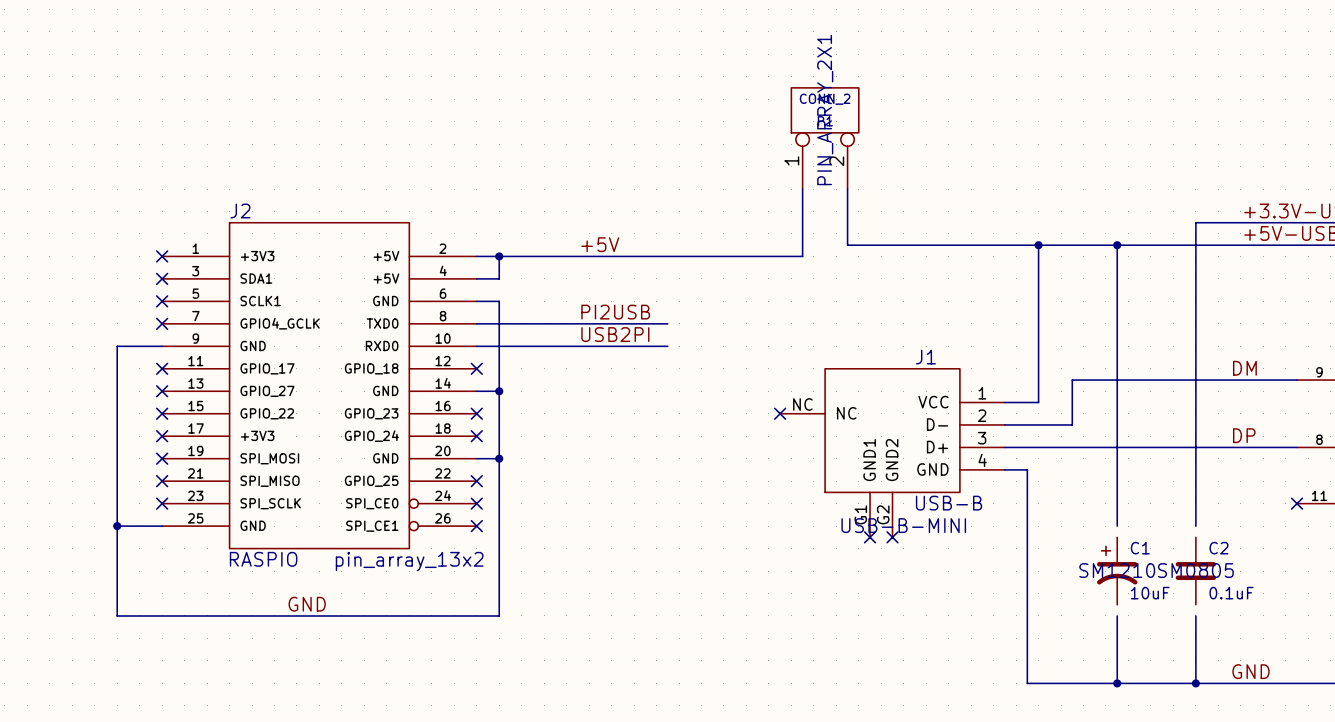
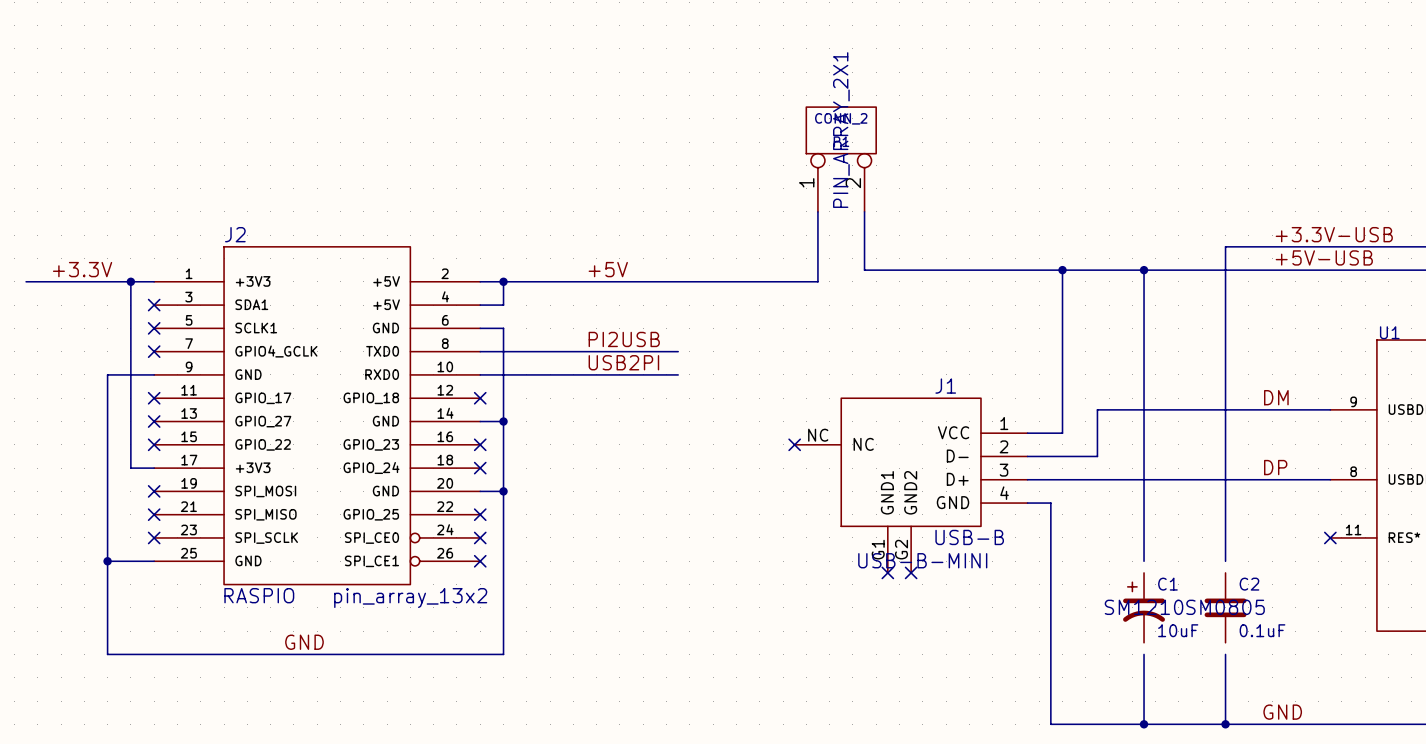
label: none -> +3.3V (82, 269)
wire: none -> (26, 281) (154, 281)
wire: none -> (130, 281) (130, 468) (154, 468)
junction: none -> (130, 281)
no-connect mark: (162, 256) -> none
no-connect mark: (162, 436) -> none

